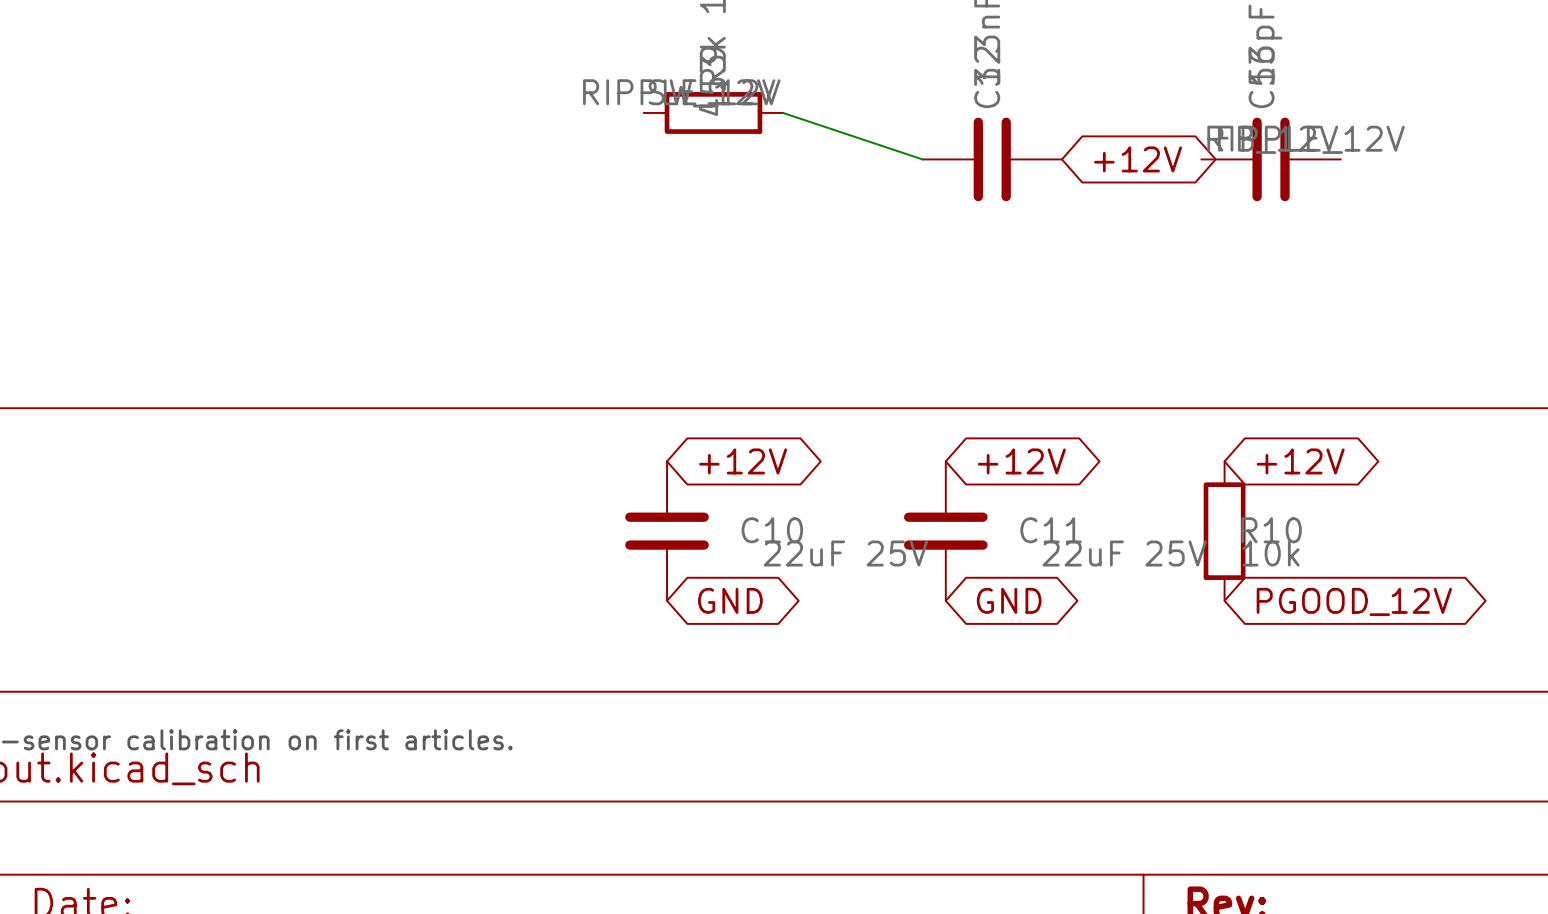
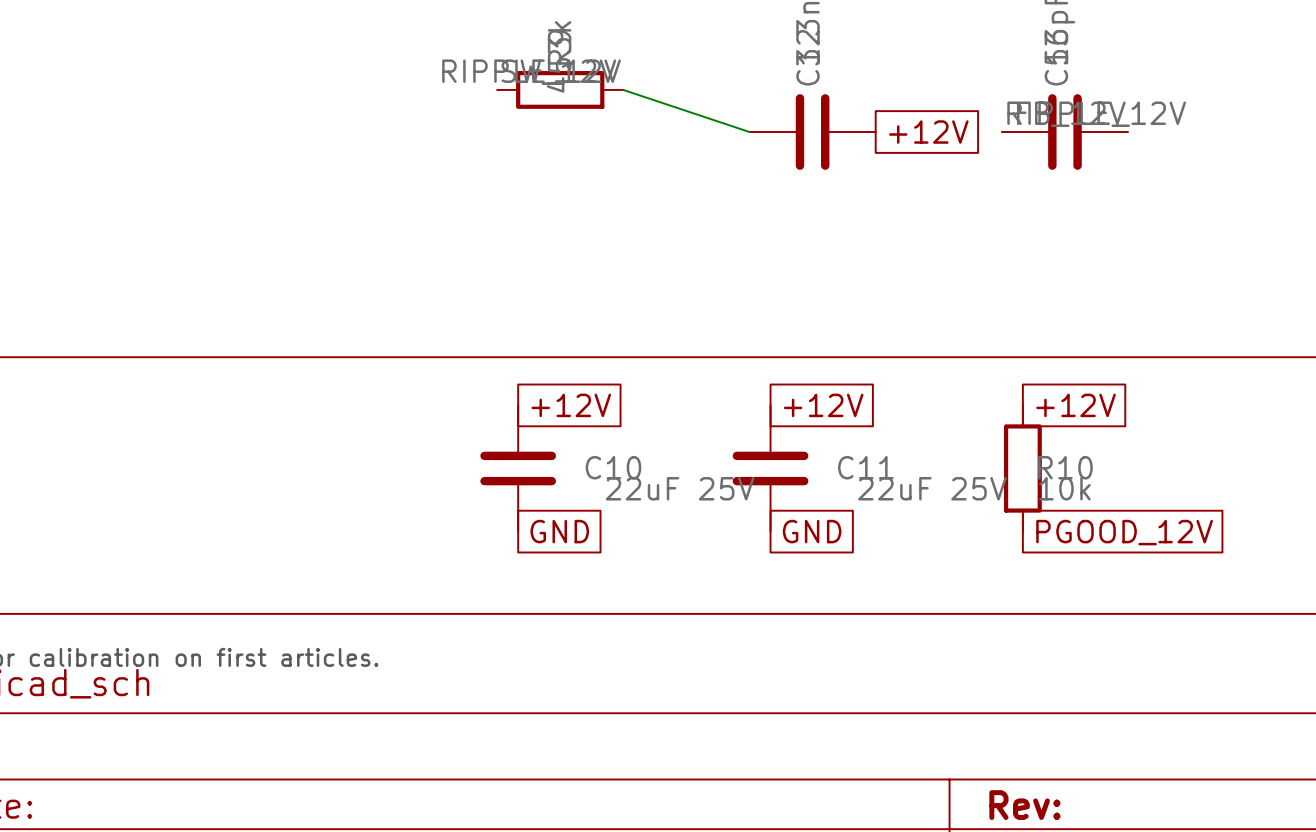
global label shape: bidirectional (1138, 159) -> passive (928, 132)
global label shape: bidirectional (743, 461) -> passive (571, 405)
global label shape: bidirectional (1021, 461) -> passive (823, 405)
global label shape: bidirectional (1300, 461) -> passive (1076, 405)
global label shape: bidirectional (730, 600) -> passive (559, 531)
global label shape: bidirectional (1009, 600) -> passive (812, 531)
global label shape: bidirectional (1354, 601) -> passive (1124, 532)

